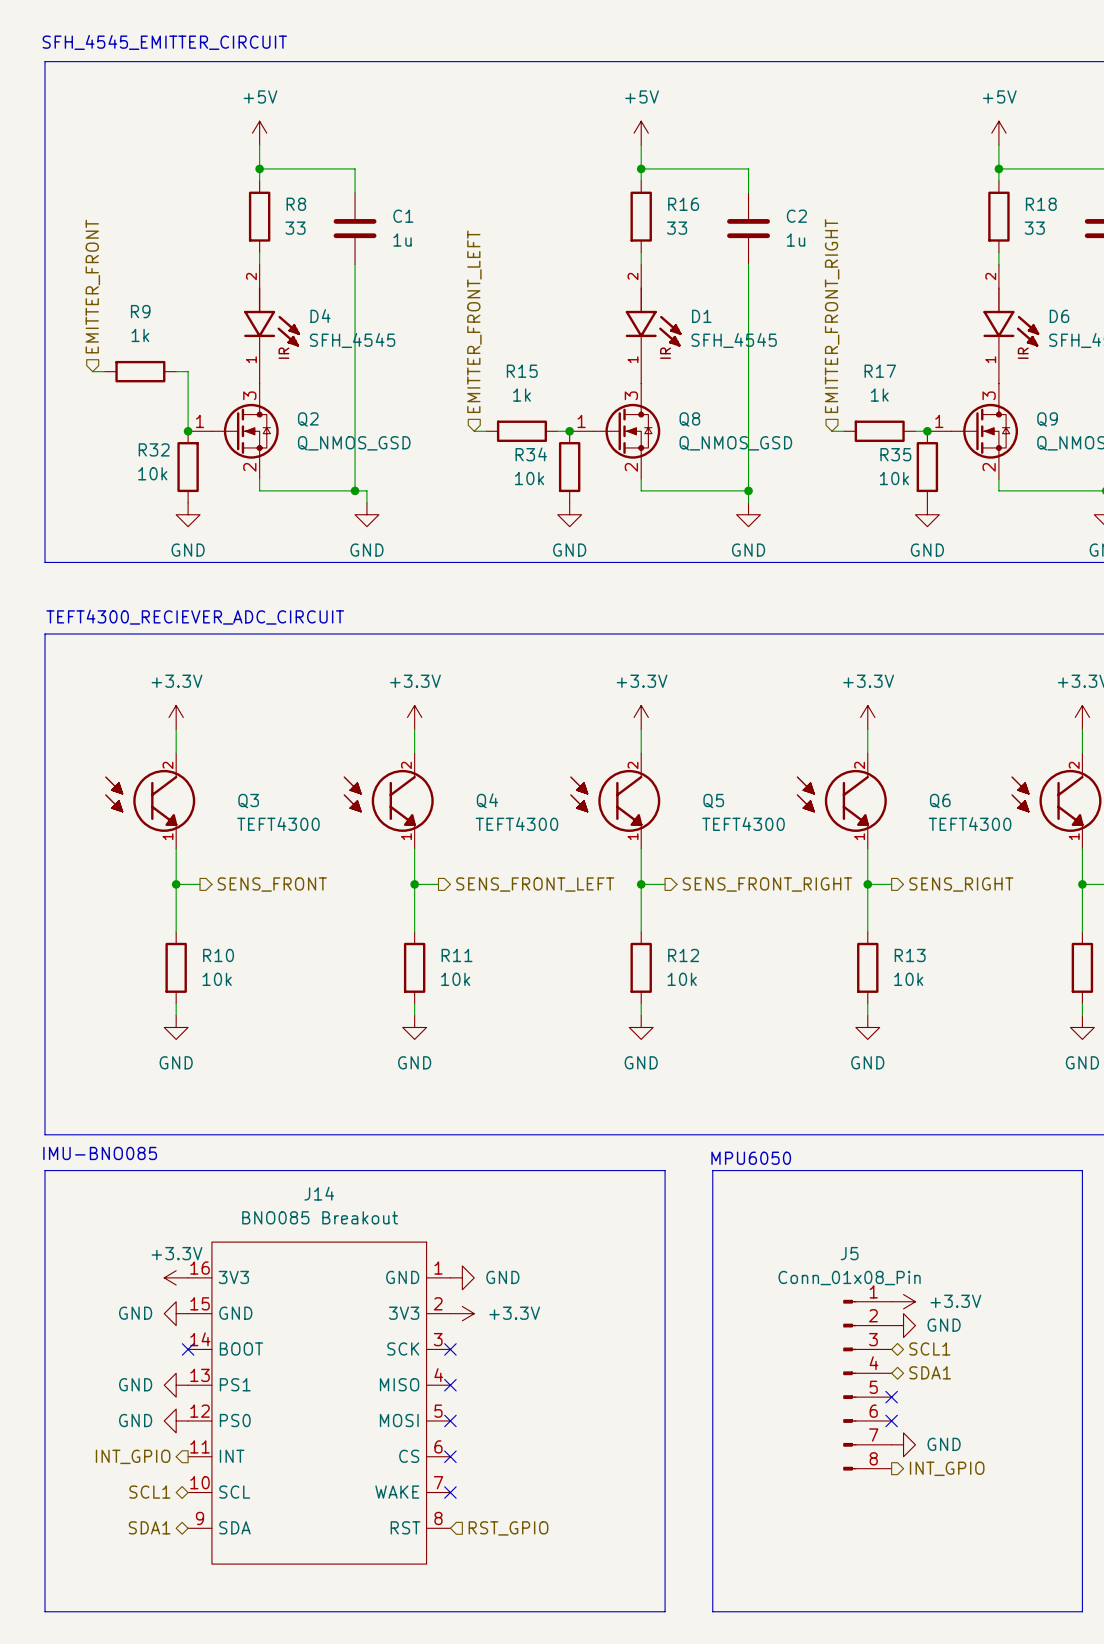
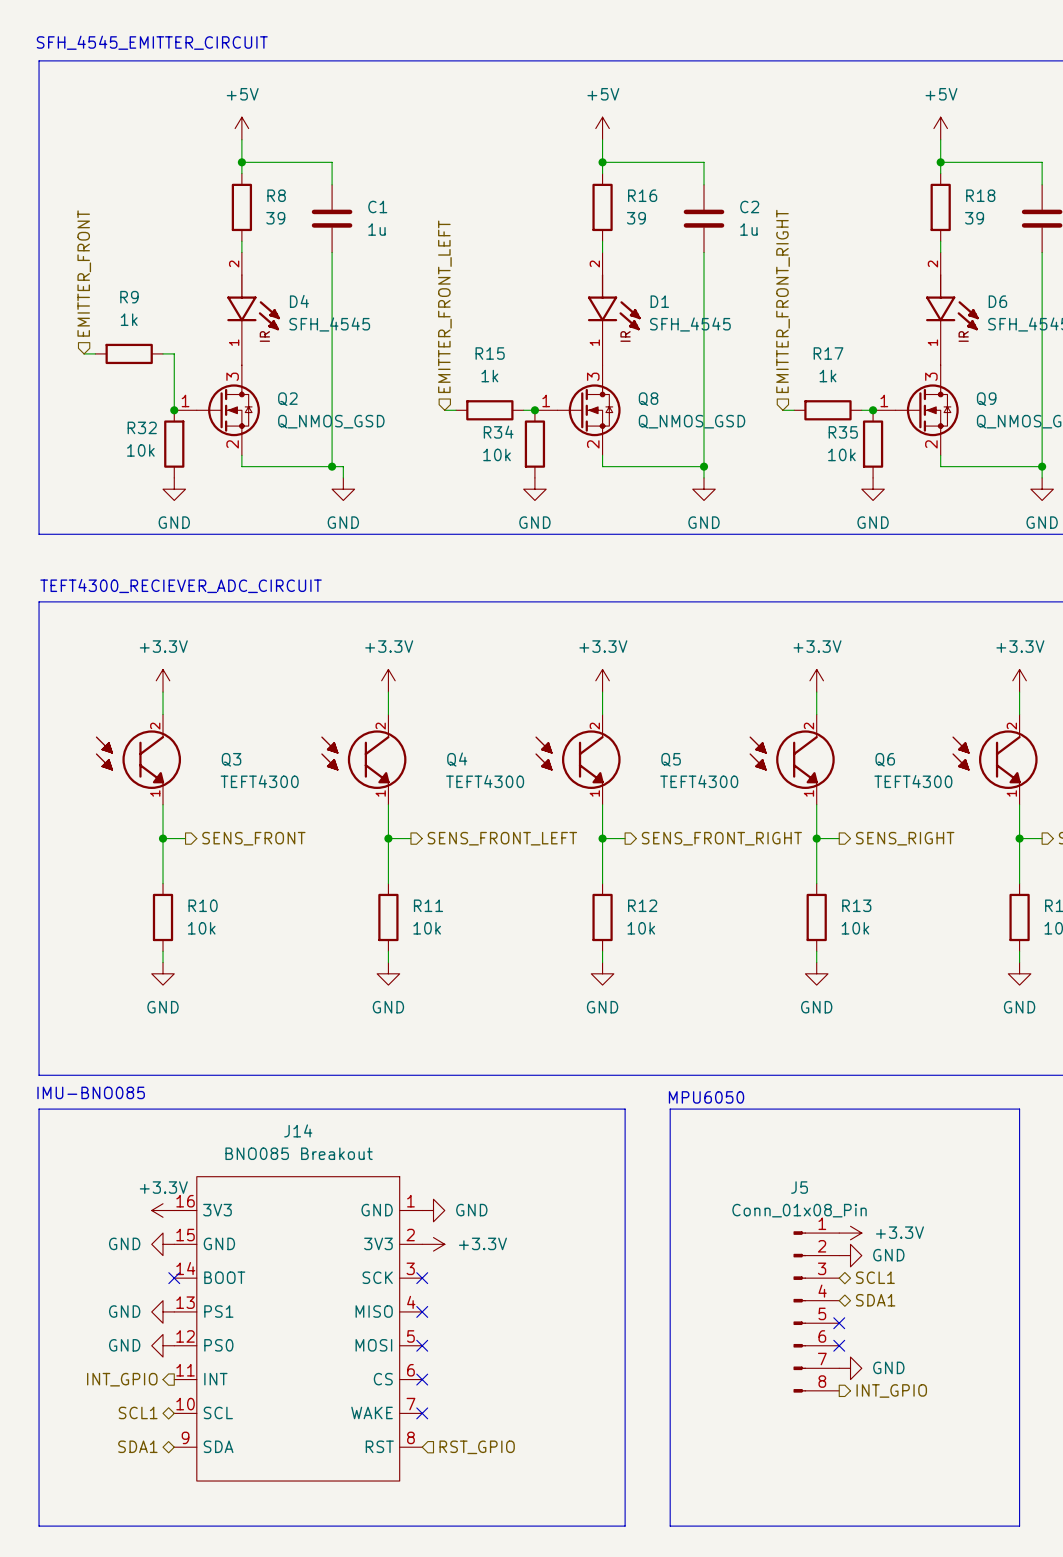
R8 value: 33 (295, 228) -> 39 (275, 218)
R16 value: 33 (677, 228) -> 39 (636, 218)
R18 value: 33 (1034, 228) -> 39 (974, 218)

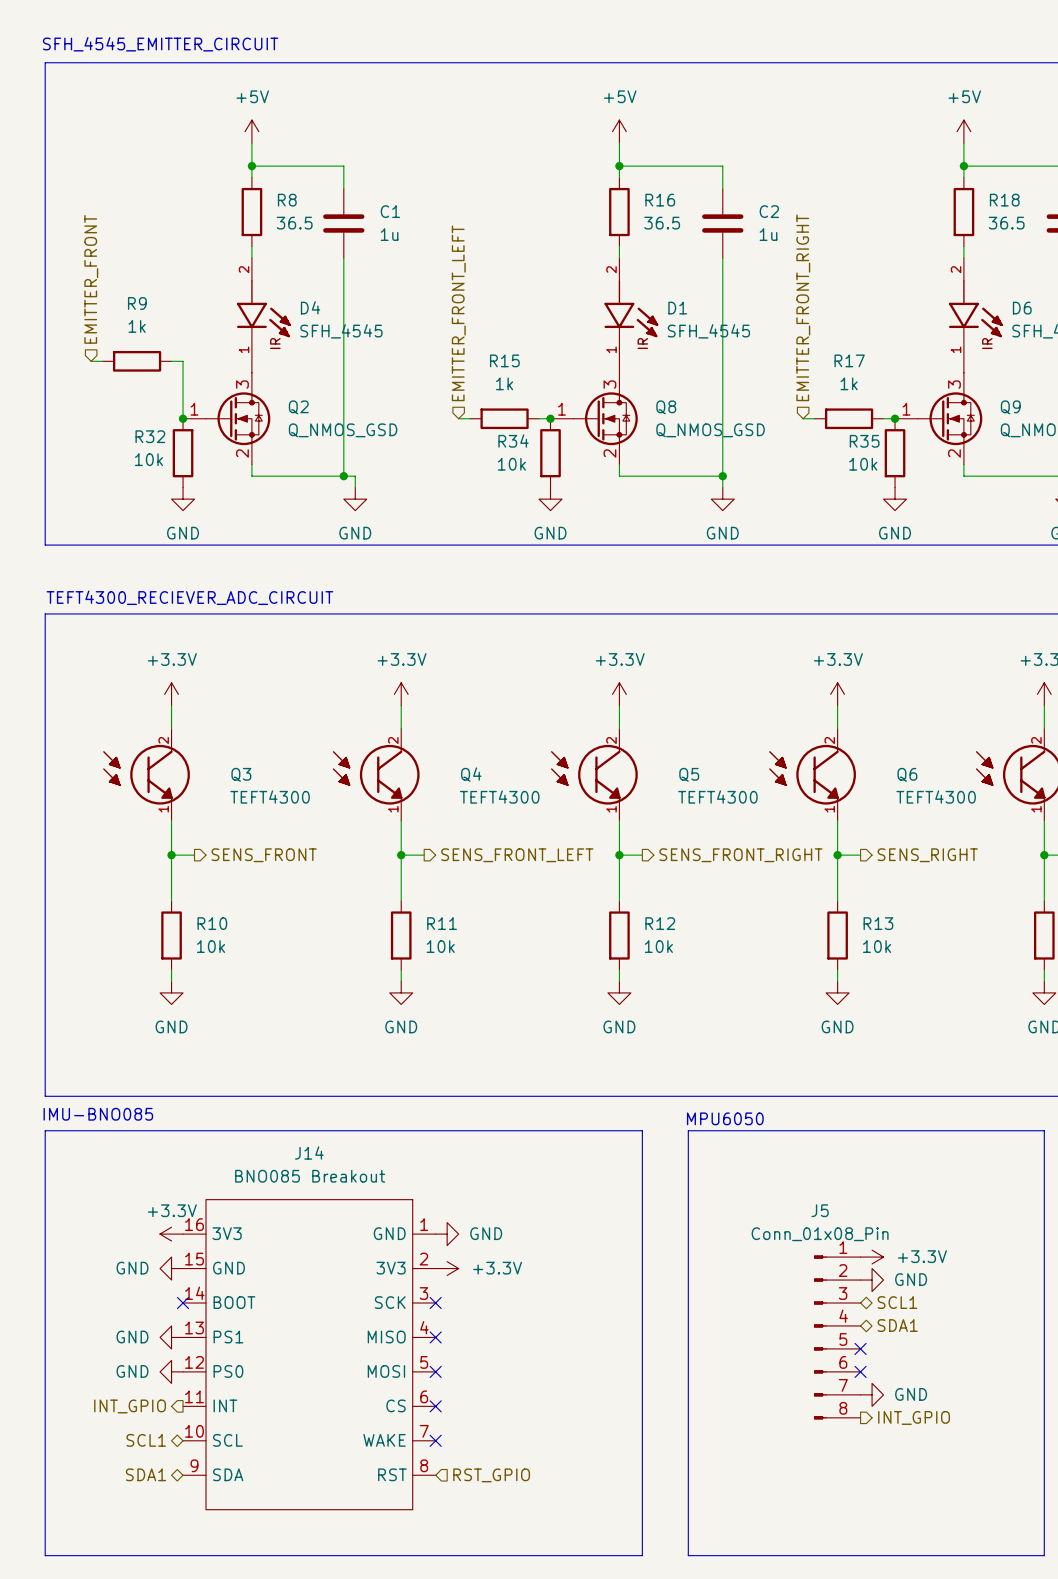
R8 value: 39 (275, 218) -> 36.5 (294, 223)
R16 value: 39 (636, 218) -> 36.5 (662, 223)
R18 value: 39 (974, 218) -> 36.5 (1006, 223)

